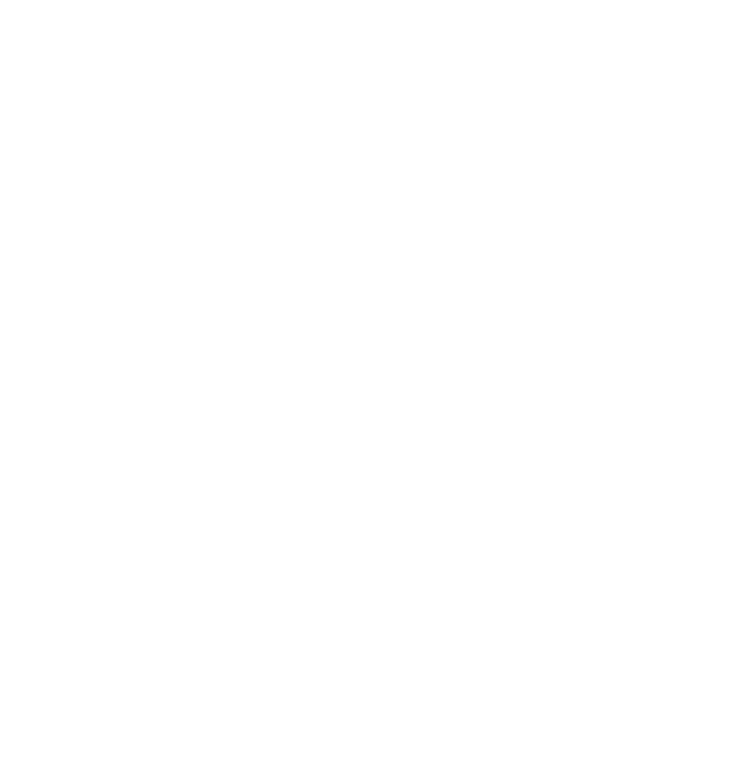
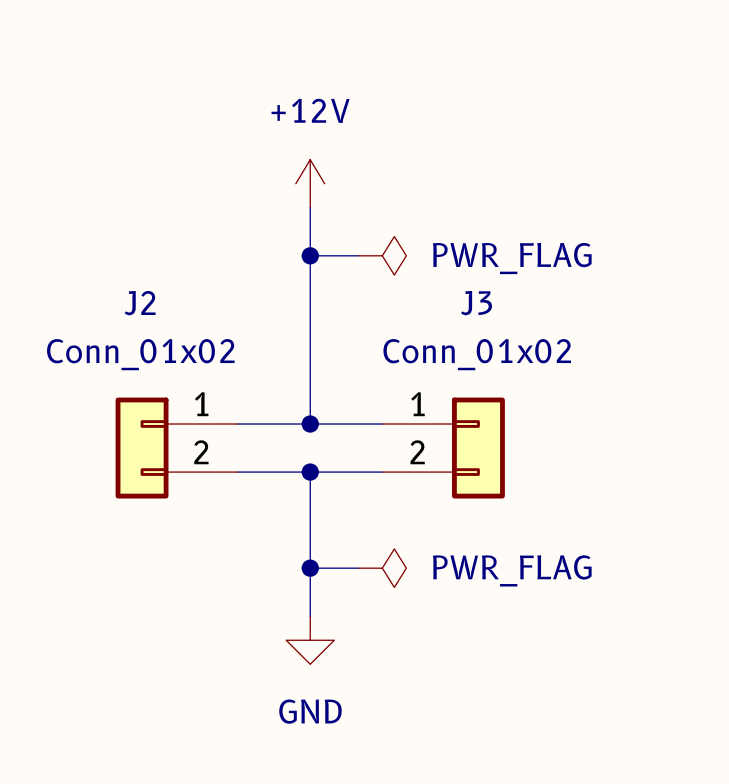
power symbol: none -> +12V (310, 183)
wire: none -> (310, 207) (310, 424)
wire: none -> (310, 255) (358, 255)
junction: none -> (310, 255)
power symbol: none -> PWR_FLAG (382, 255)
wire: none -> (238, 424) (382, 424)
junction: none -> (310, 424)
J2: none -> Conn_01x02 (176, 448)
J3: none -> Conn_01x02 (443, 448)
wire: none -> (238, 472) (382, 472)
wire: none -> (310, 472) (310, 616)
junction: none -> (310, 472)
wire: none -> (310, 568) (358, 568)
junction: none -> (310, 568)
power symbol: none -> PWR_FLAG (382, 568)
power symbol: none -> GND (310, 640)

